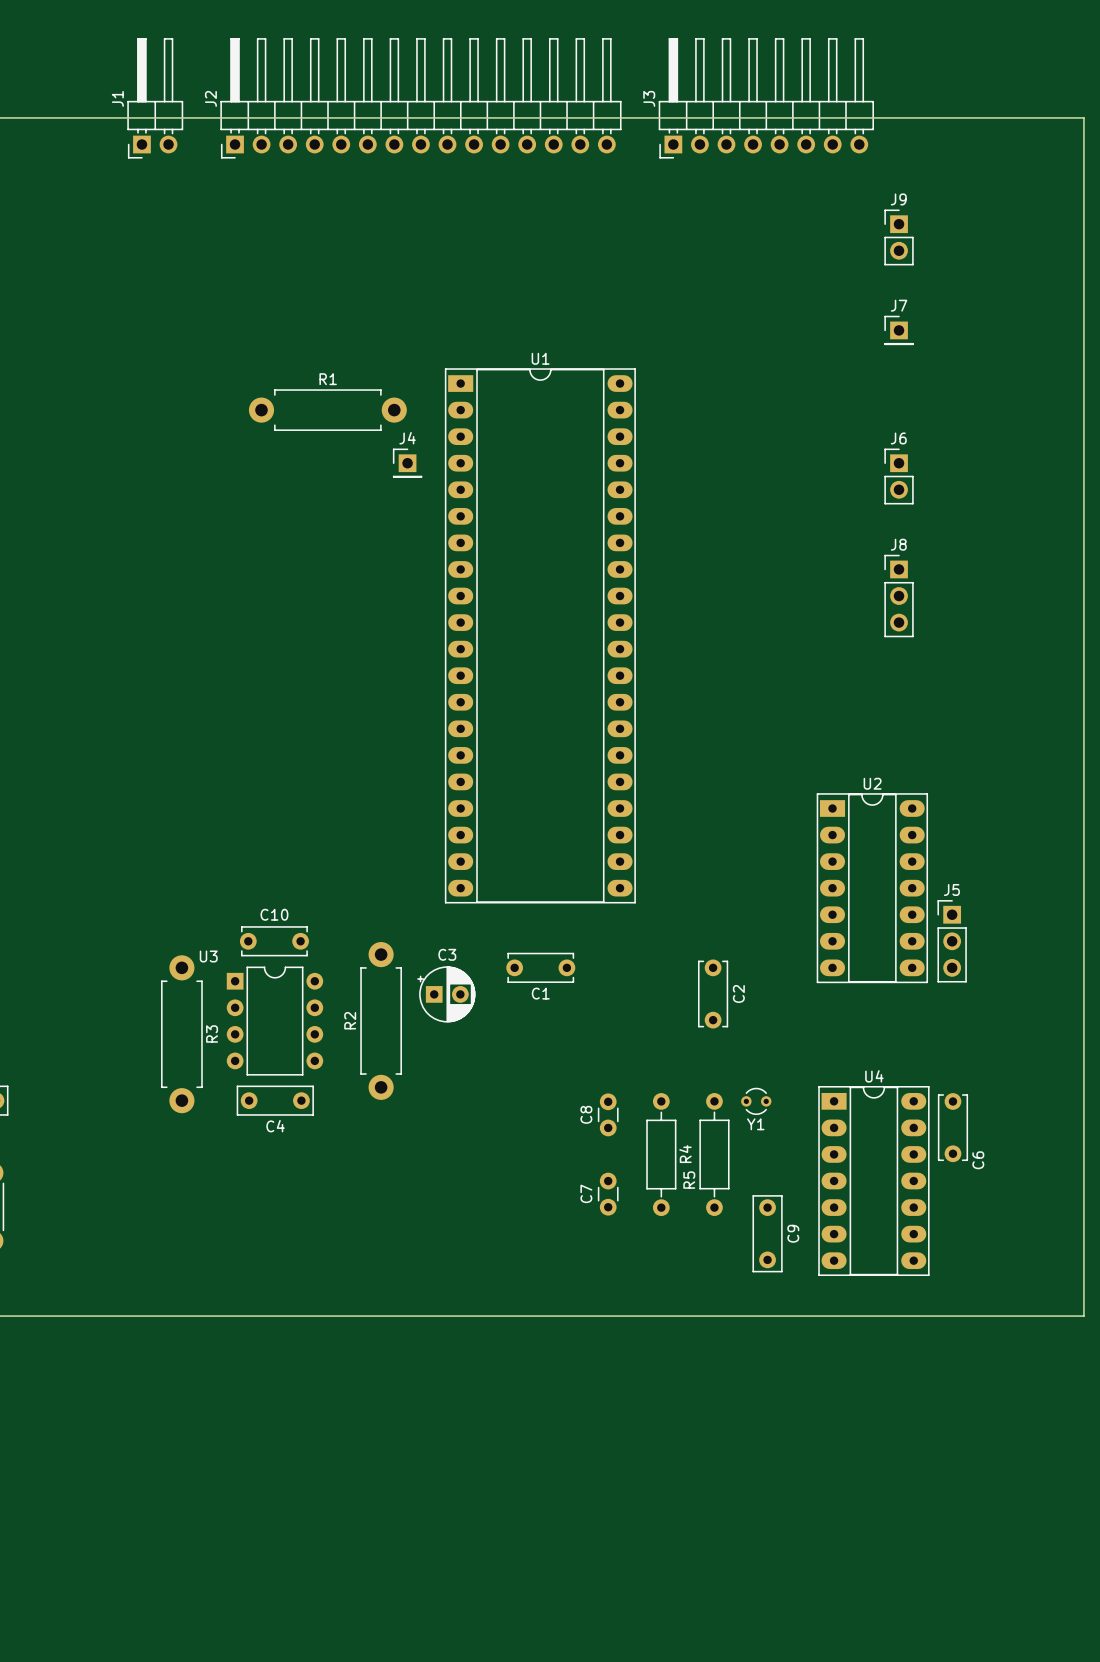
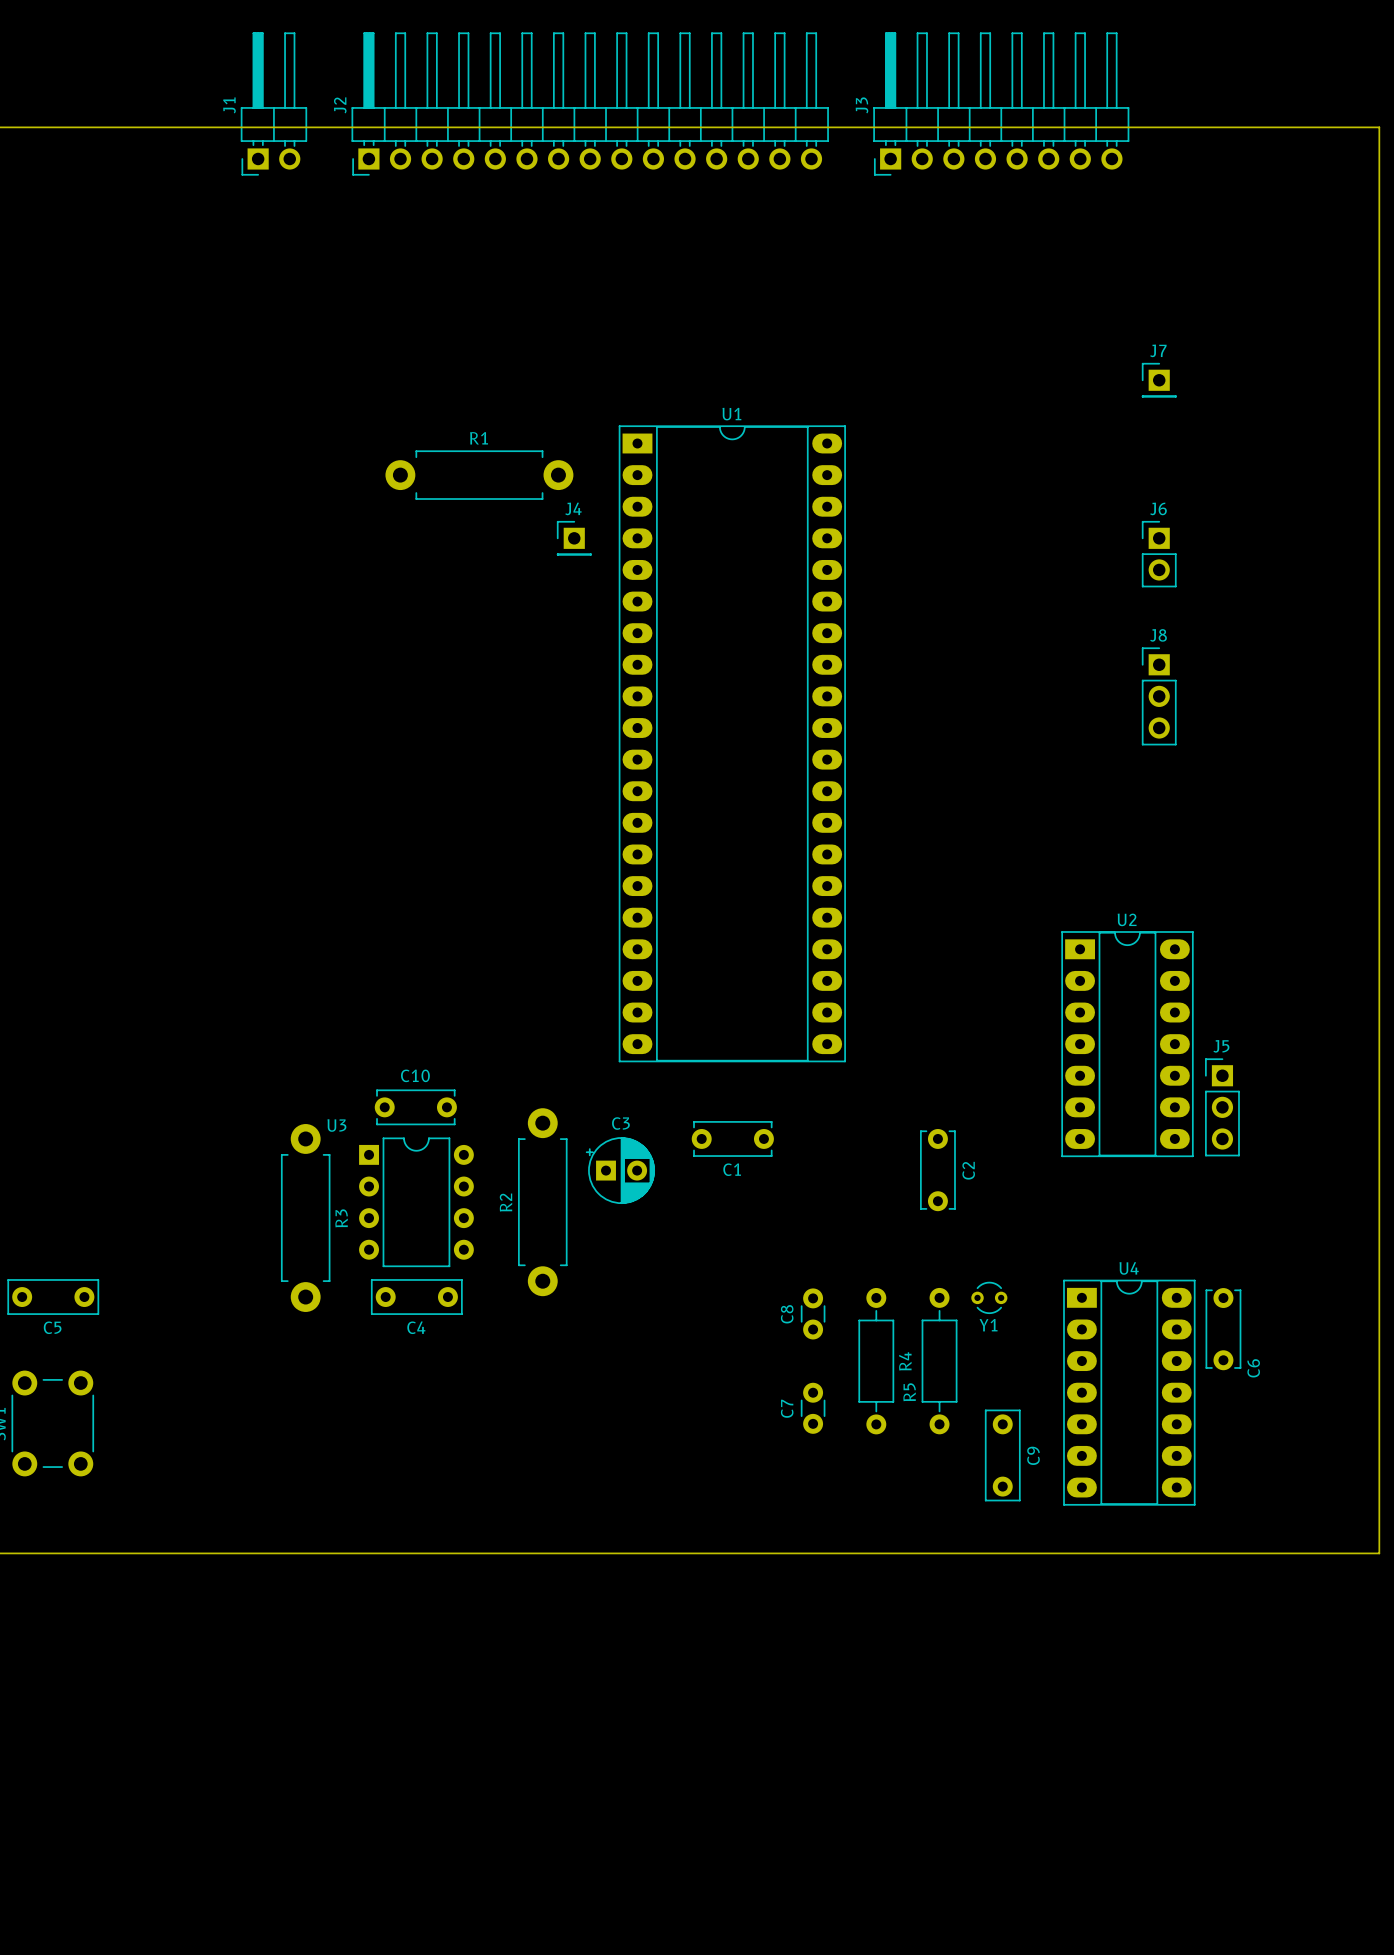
J9: (899, 237) -> none

